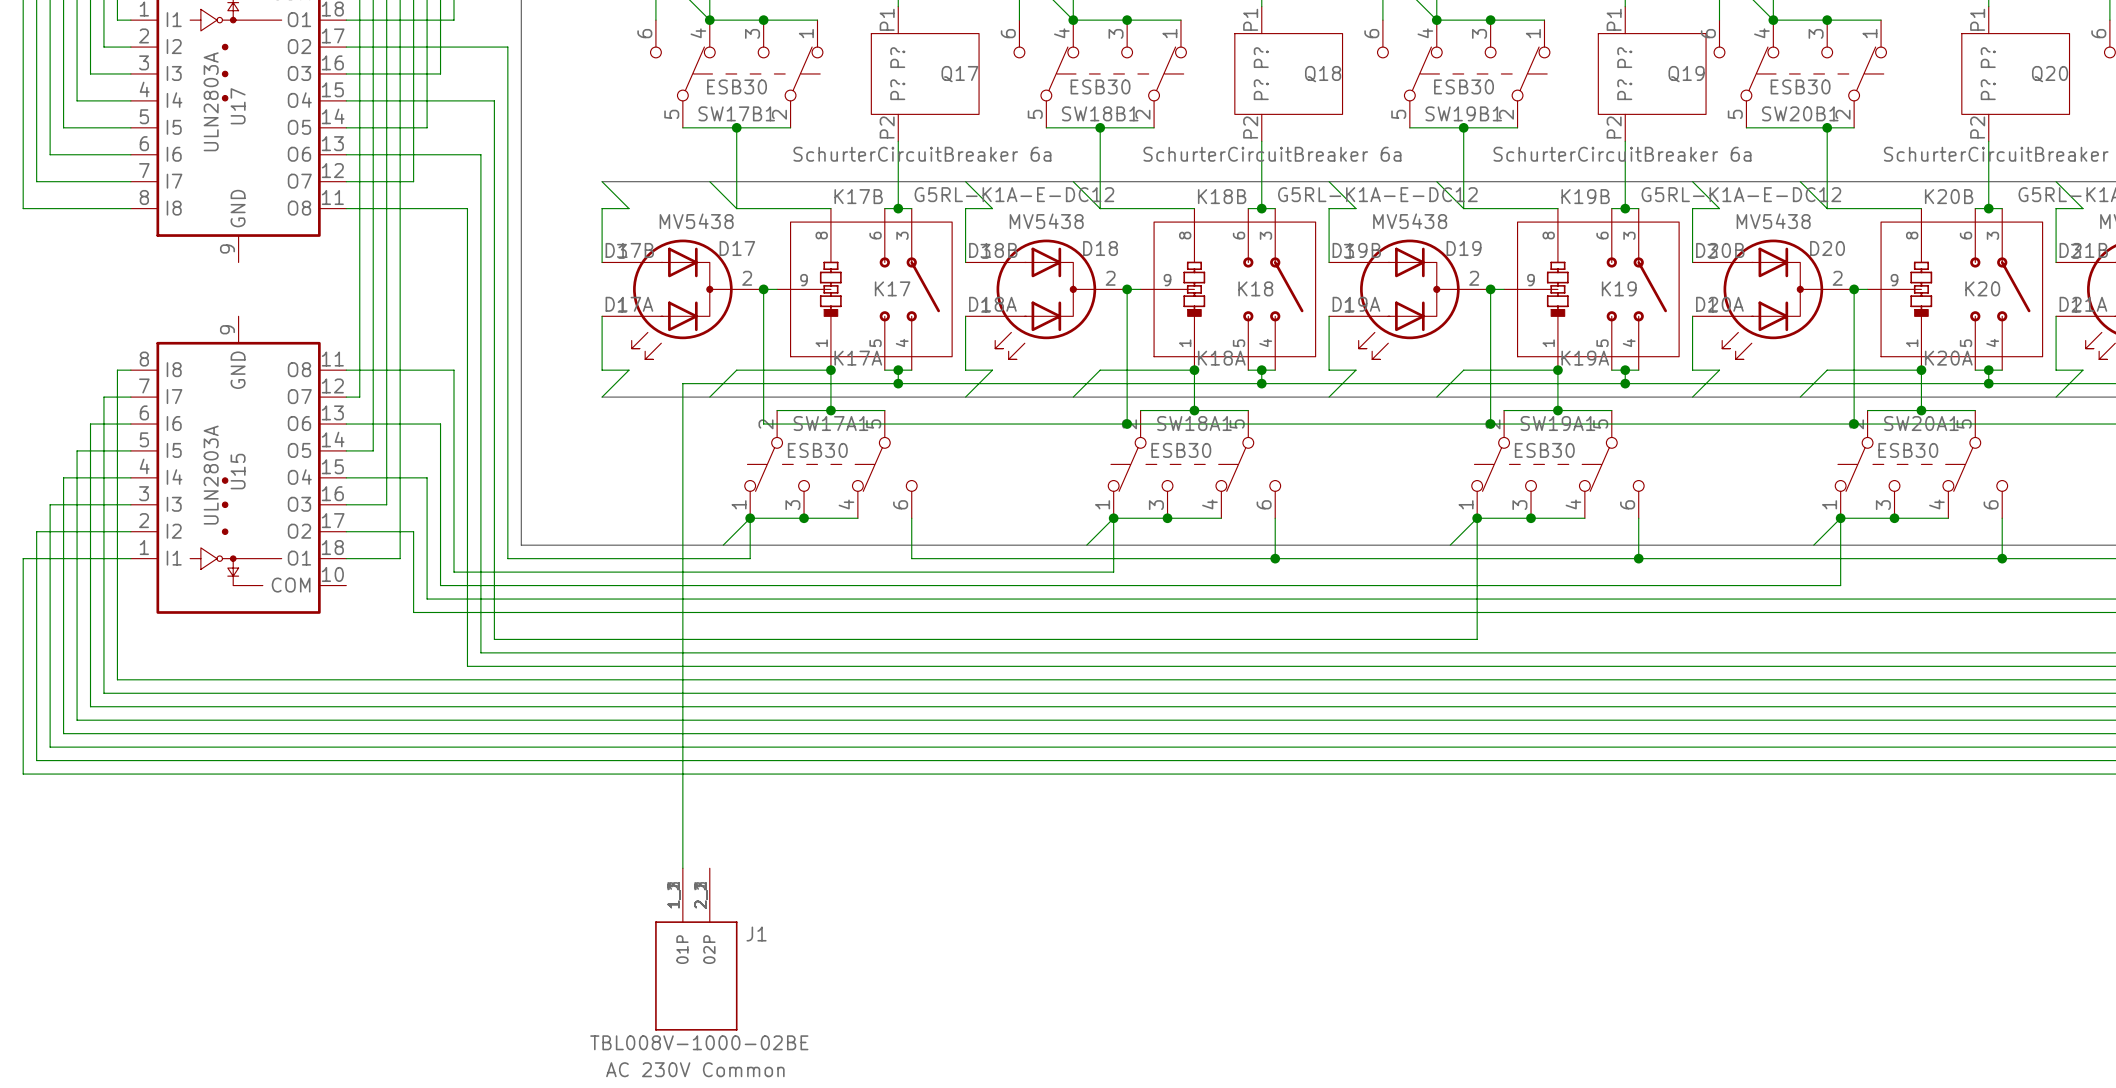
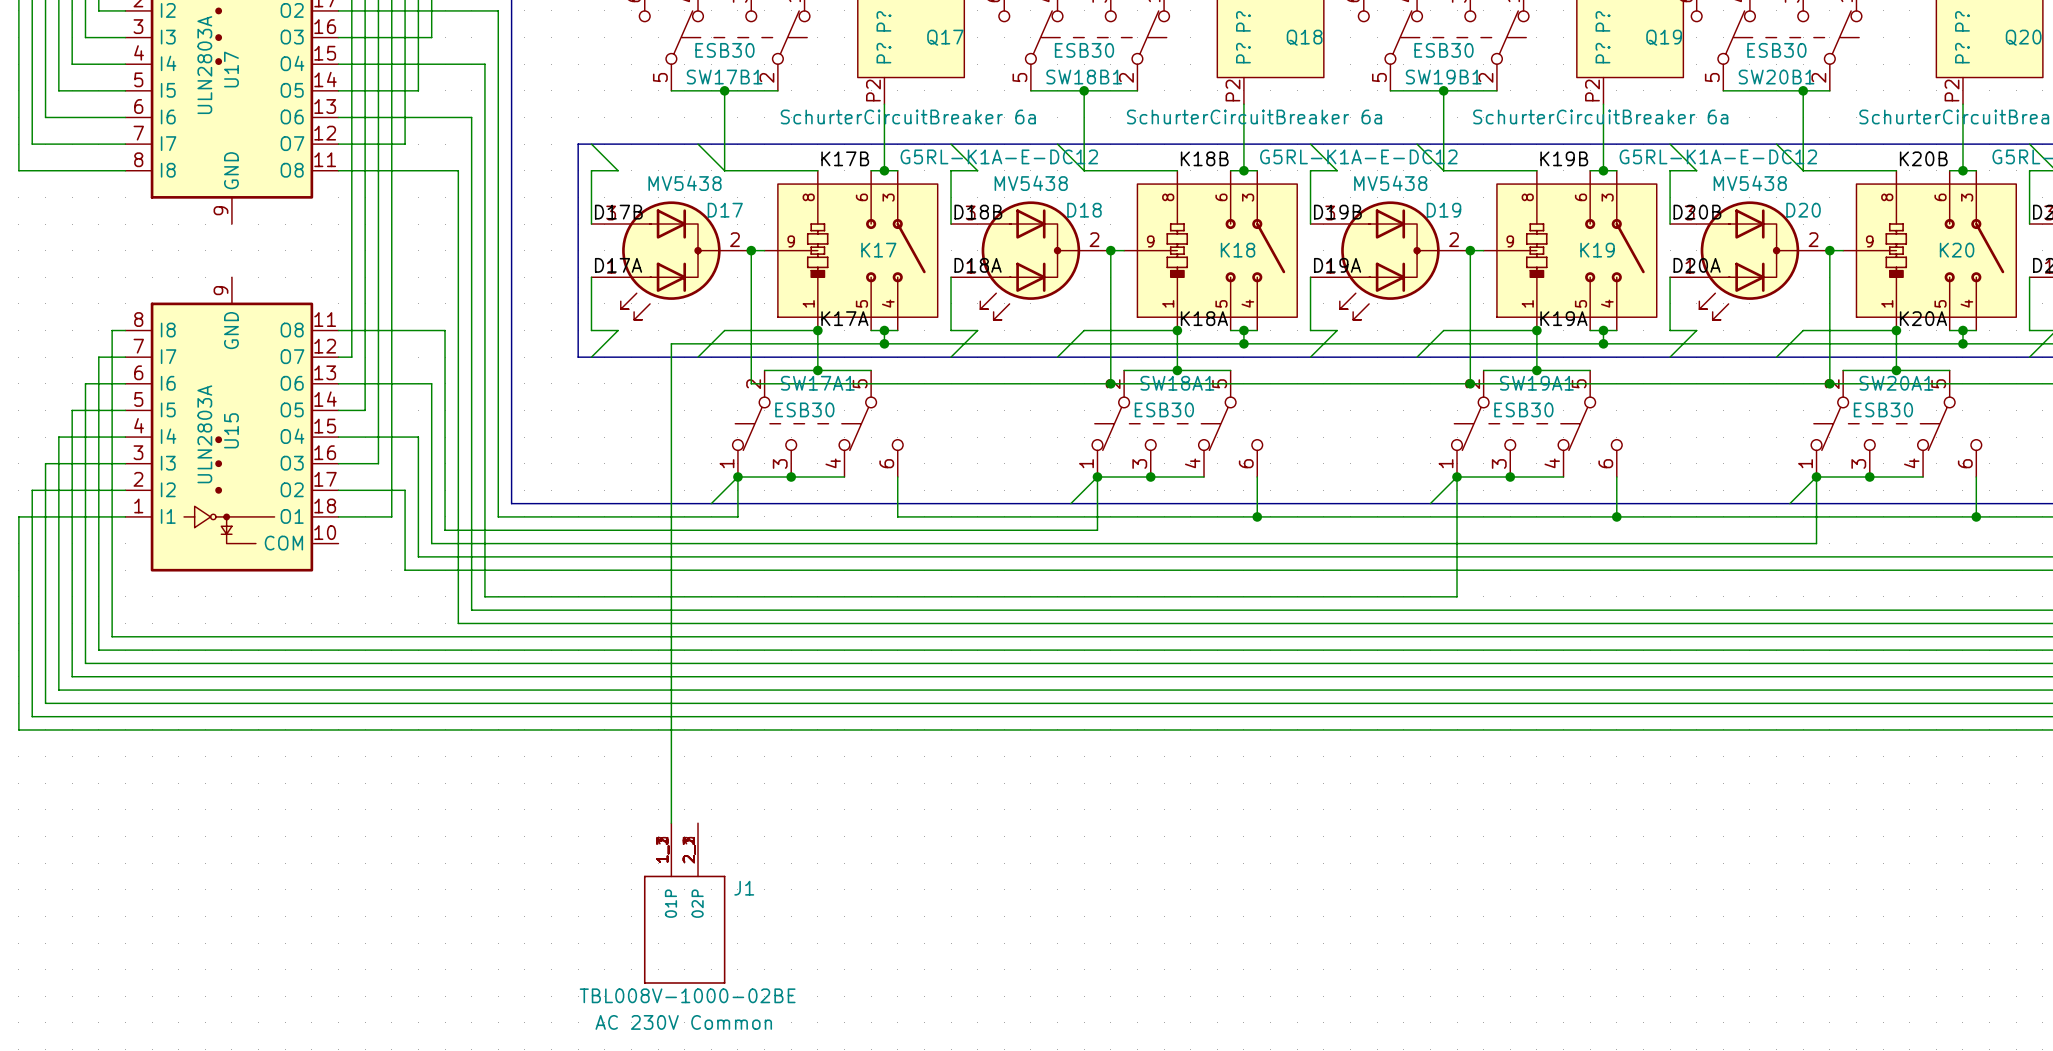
bus: none -> (591, 144) (578, 144) (578, 357) (591, 357)

